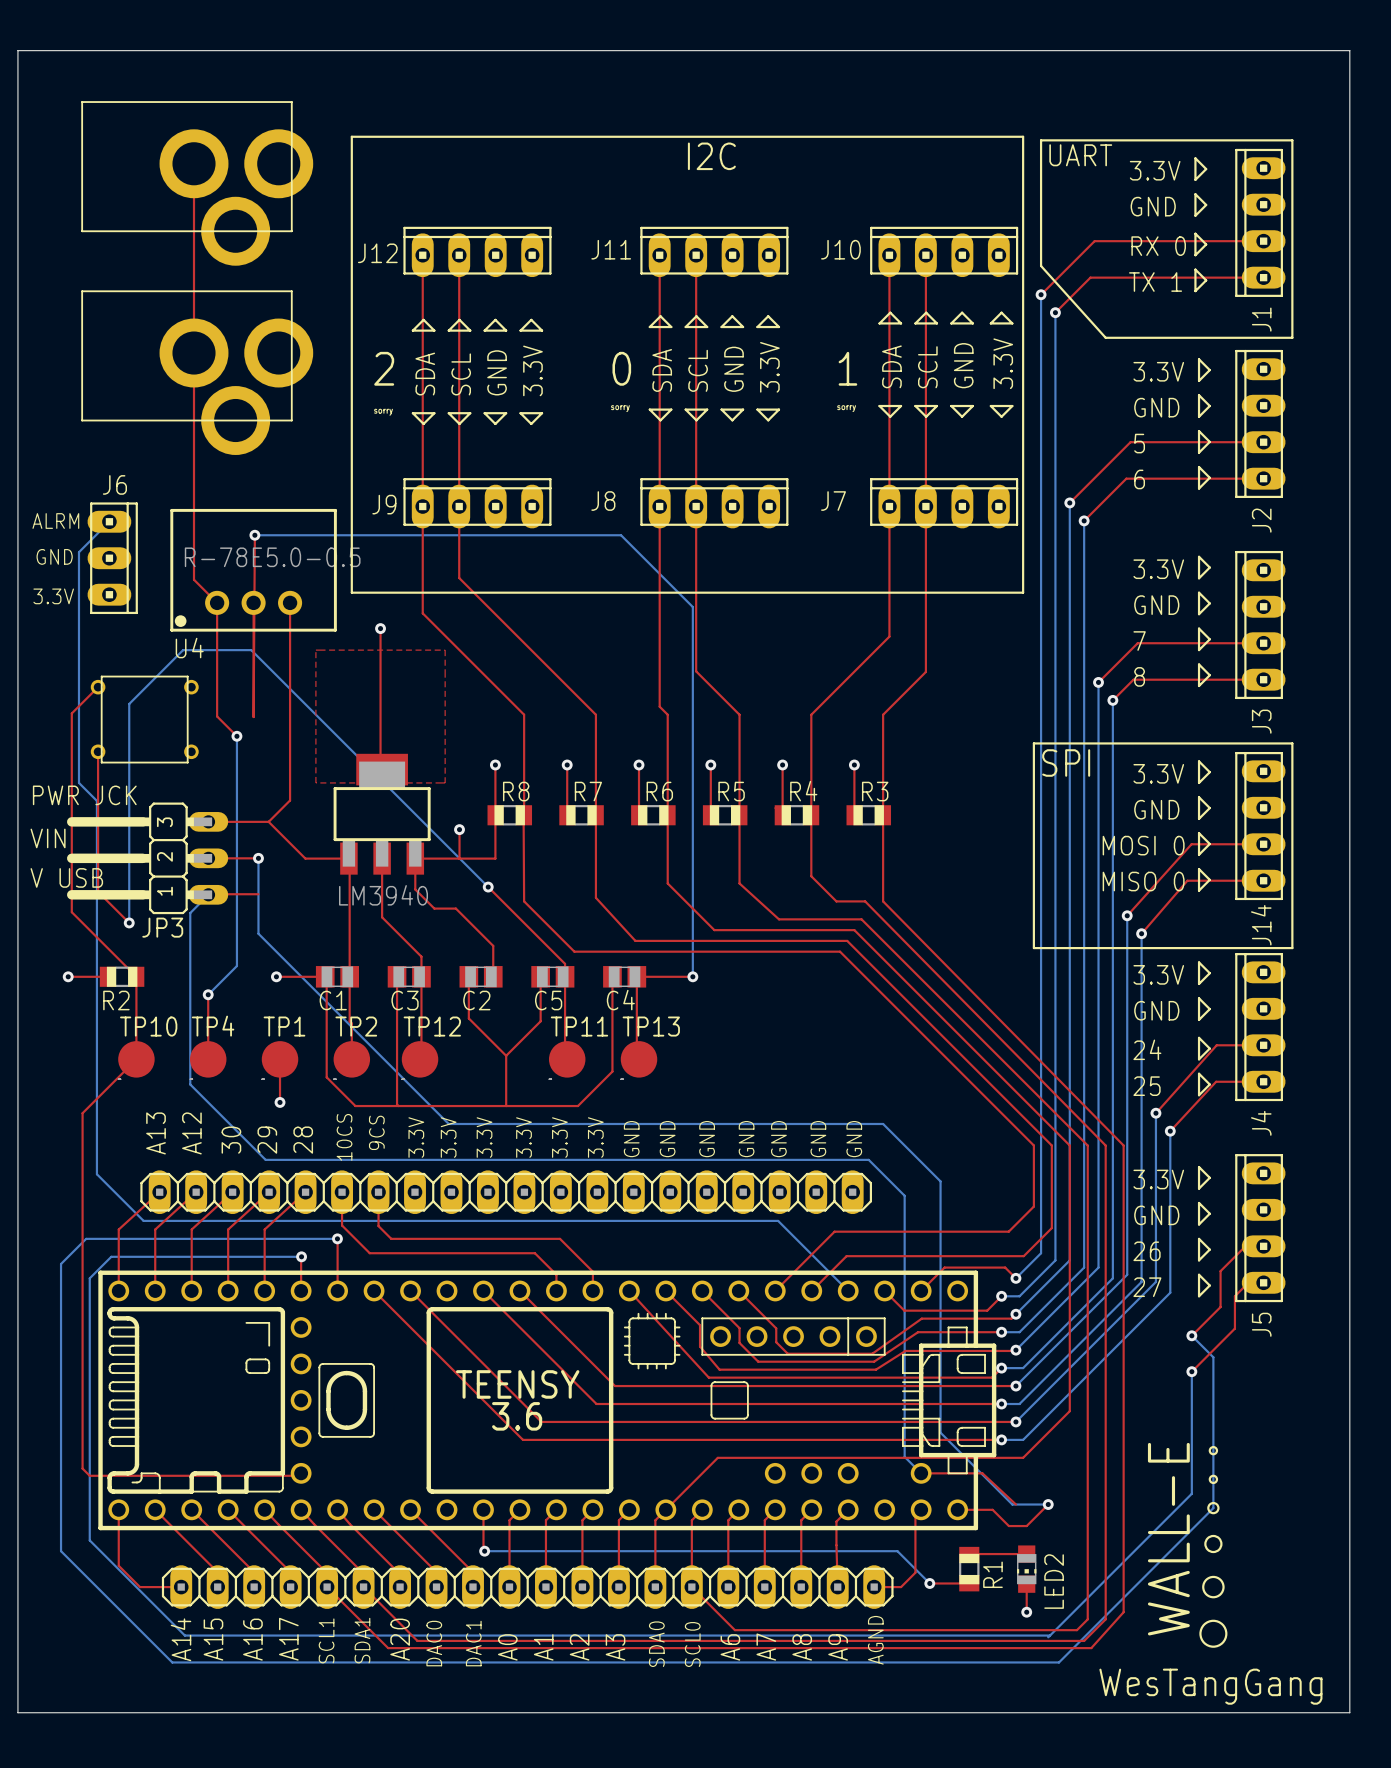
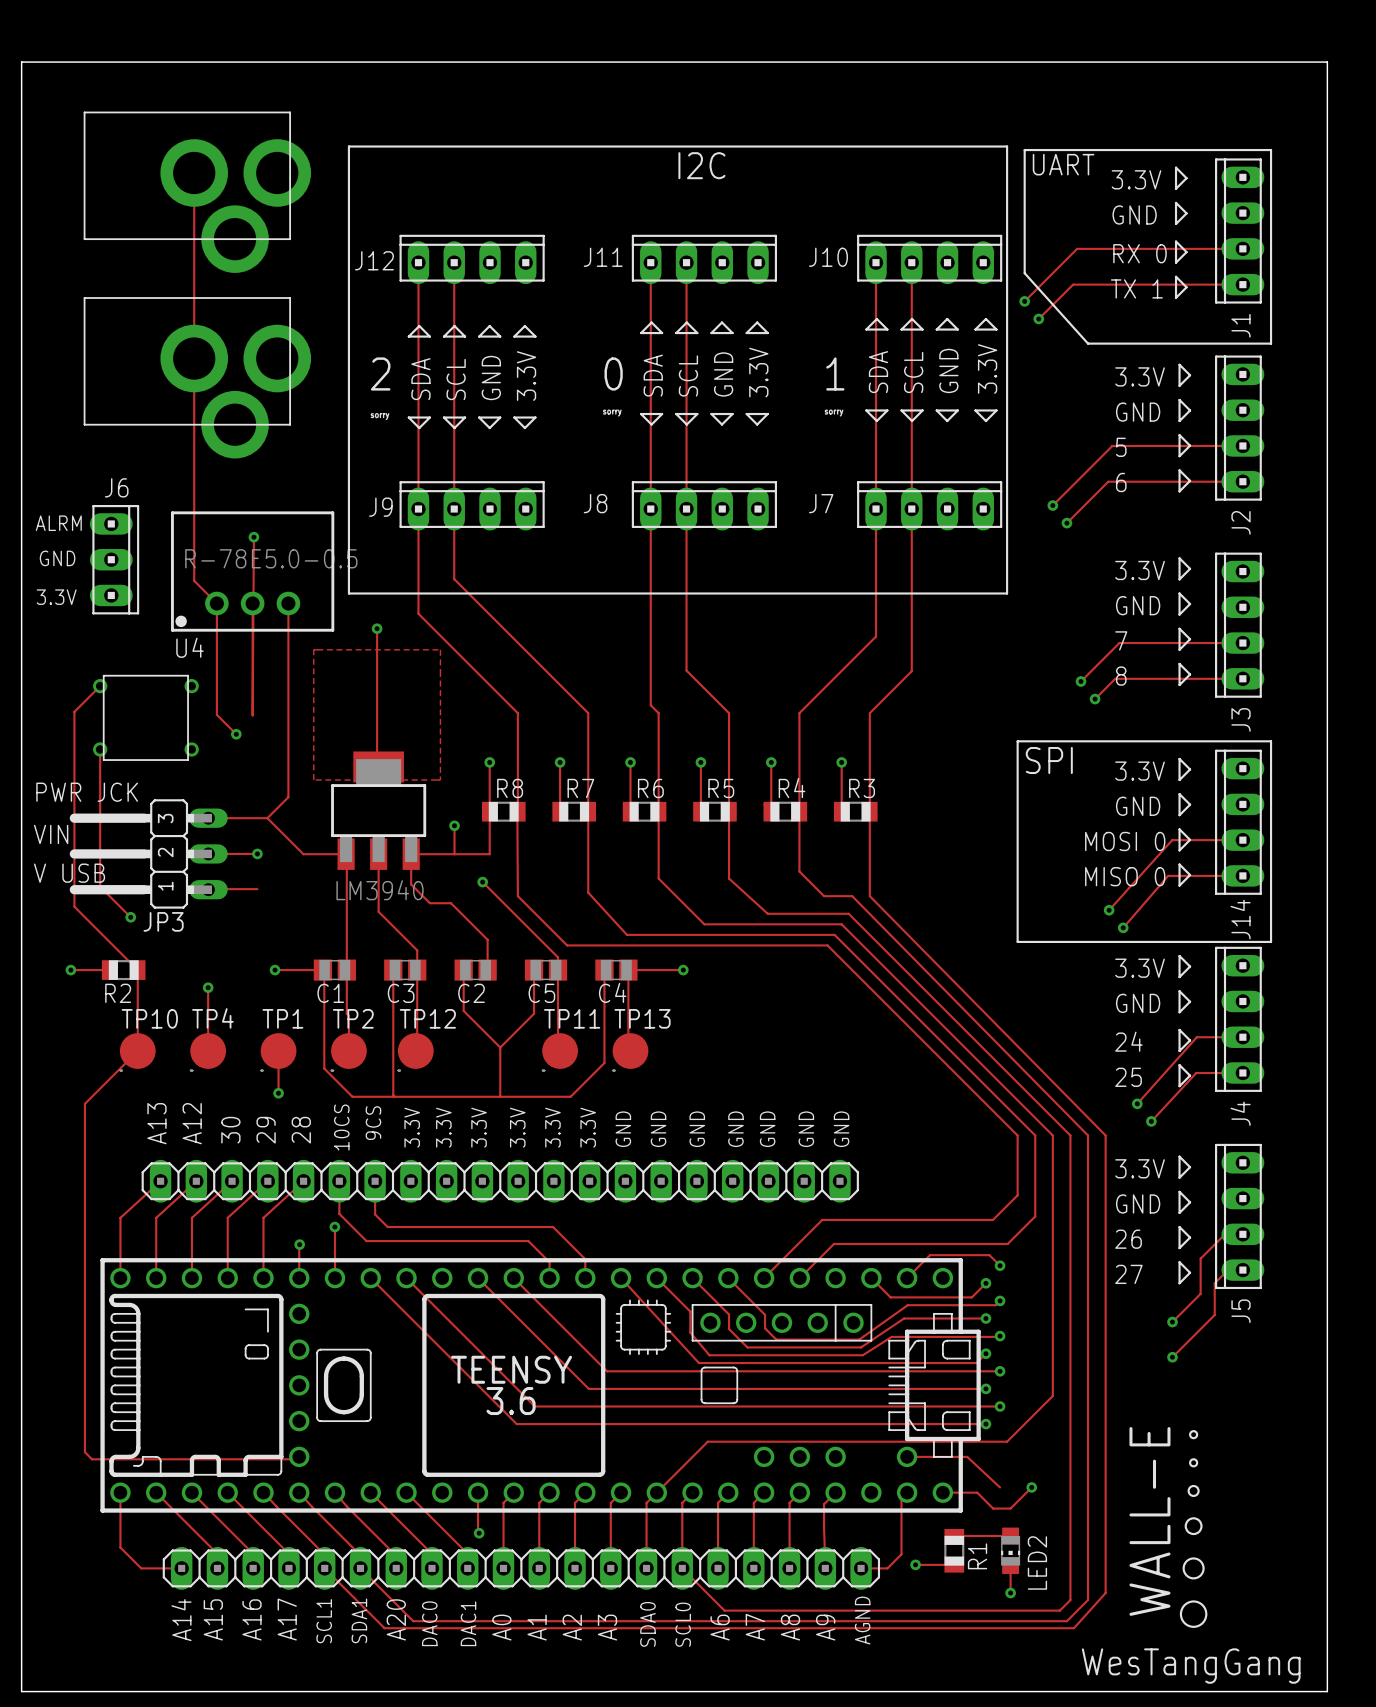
bottom track: (1041, 294) (1041, 1253) (1015, 1278) -> none
bottom track: (1055, 312) (1055, 1260) (1019, 1296) (1001, 1296) -> none
bottom track: (1069, 502) (1069, 1260) (1015, 1314) -> none
bottom track: (1084, 520) (1084, 1267) (1019, 1332) (1001, 1332) -> none
bottom track: (109, 521) (78, 552) (78, 782) (96, 800) (96, 1174) (143, 1220) (778, 1220) (848, 1290) -> none
bottom track: (254, 535) (621, 535) (692, 607) (692, 976) -> none
bottom track: (1098, 682) (1098, 1267) (1015, 1350) -> none
bottom track: (1112, 700) (1112, 1278) (1023, 1368) (1001, 1368) -> none
bottom track: (236, 736) (236, 966) (208, 994) -> none
bottom track: (258, 858) (258, 933) (448, 1123) (883, 1123) (940, 1181) (940, 1432) (1012, 1504) (1048, 1504) -> none
bottom track: (488, 887) (251, 650) (183, 650) (129, 703) (129, 922) -> none
bottom track: (208, 894) (190, 913) (190, 1084) (265, 1159) (868, 1159) (904, 1195) (904, 1456) (921, 1473) -> none
bottom track: (1127, 915) (1127, 1274) (1015, 1386) -> none
bottom track: (1141, 933) (1141, 1281) (1019, 1403) (1001, 1403) -> none
bottom track: (1155, 1113) (1155, 1281) (1015, 1421) -> none
bottom track: (1170, 1131) (1170, 1292) (1023, 1439) (1001, 1439) -> none
bottom track: (337, 1238) (86, 1238) (61, 1263) (61, 1551) (172, 1662) (1059, 1662) (1213, 1508) (1213, 1357) (1191, 1335) -> none
bottom track: (301, 1256) (111, 1256) (89, 1278) (89, 1540) (184, 1635) (1050, 1635) -> none
bottom track: (1191, 1371) (1191, 1493) (1048, 1637) -> none
bottom track: (484, 1551) (897, 1551) (929, 1583) -> none

